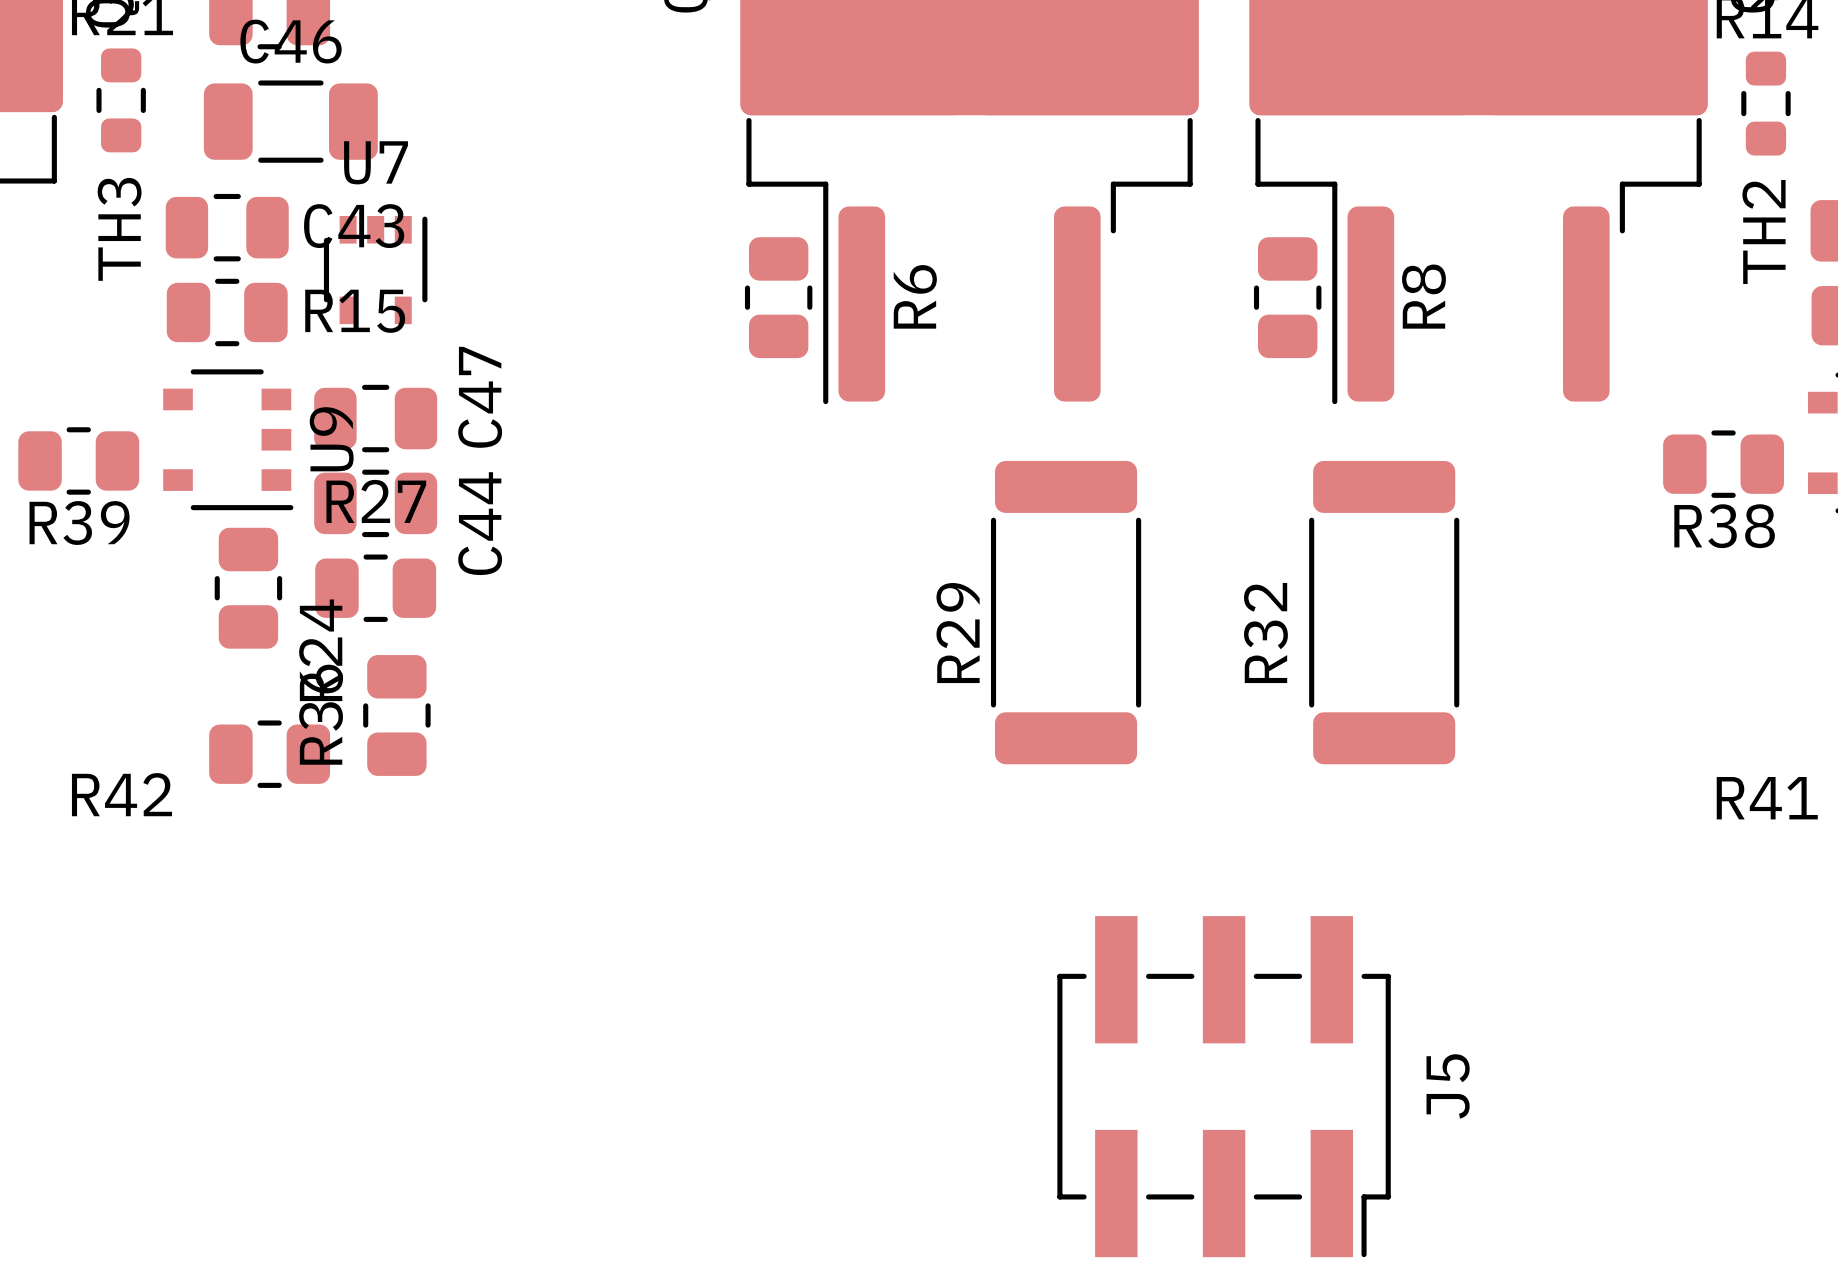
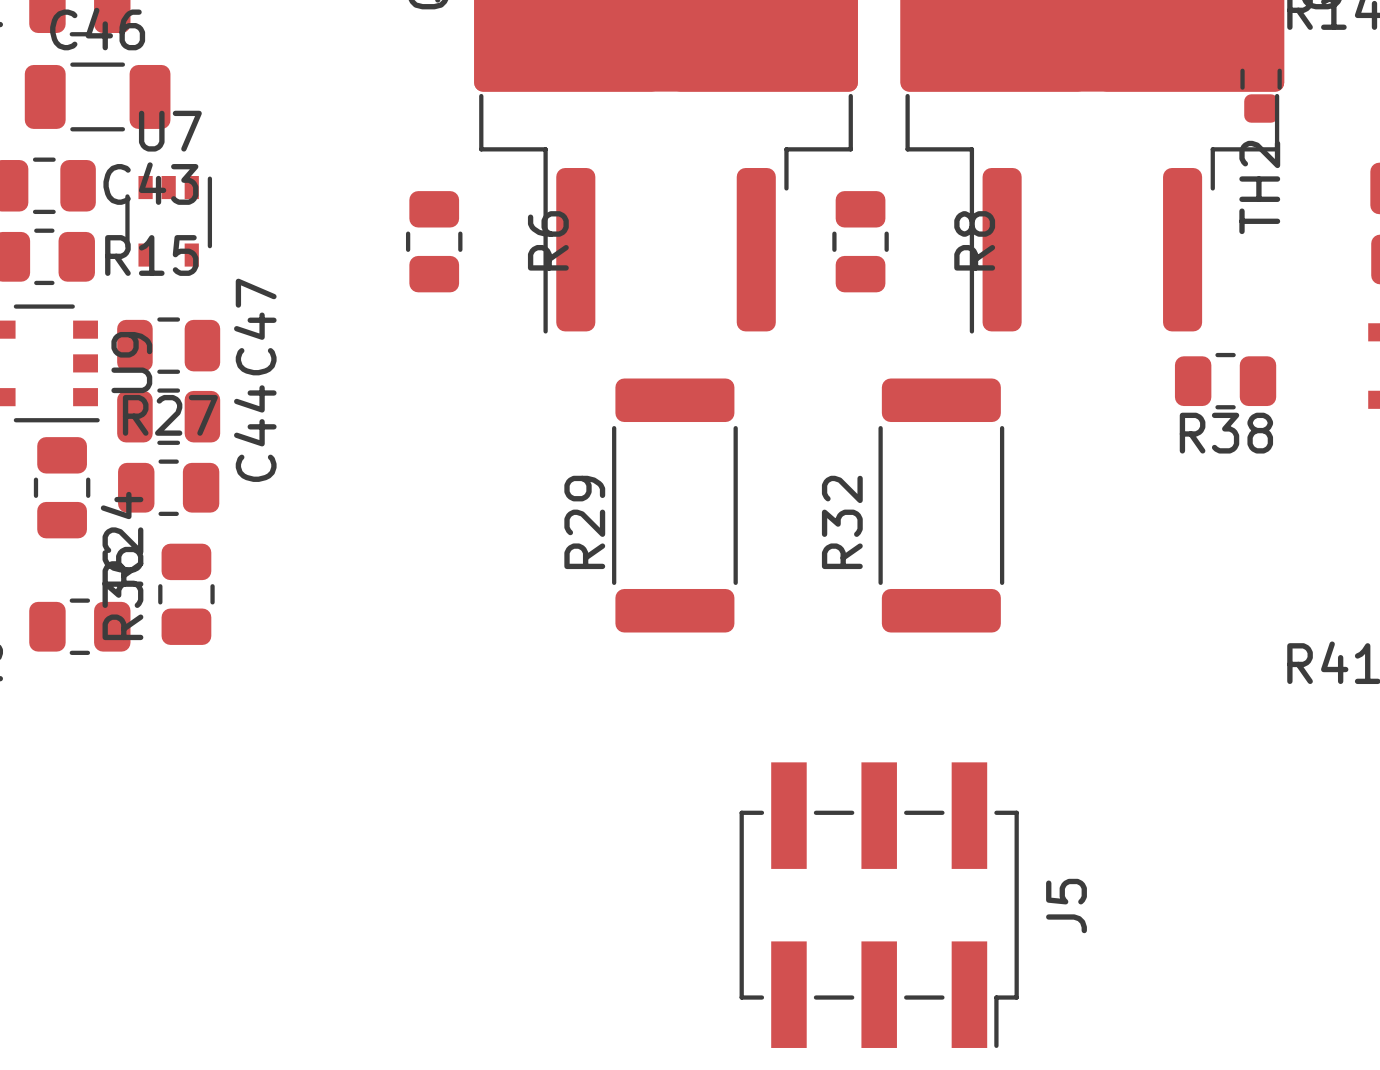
TH2 position: (1765, 103) -> (1261, 79)
R6 position: (778, 297) -> (434, 241)
R8 position: (1287, 297) -> (860, 241)
R38 position: (1723, 464) -> (1225, 381)
R29 position: (1066, 612) -> (674, 505)
R32 position: (1384, 612) -> (941, 505)

